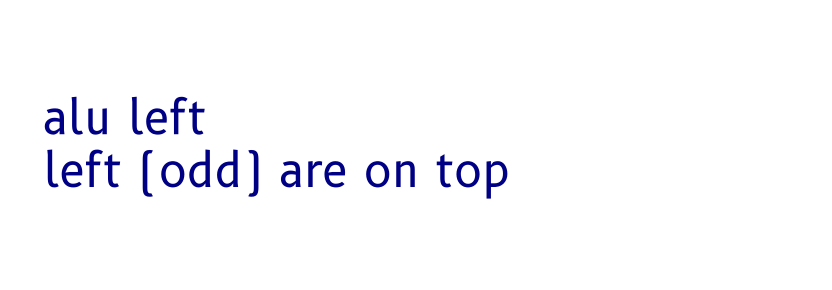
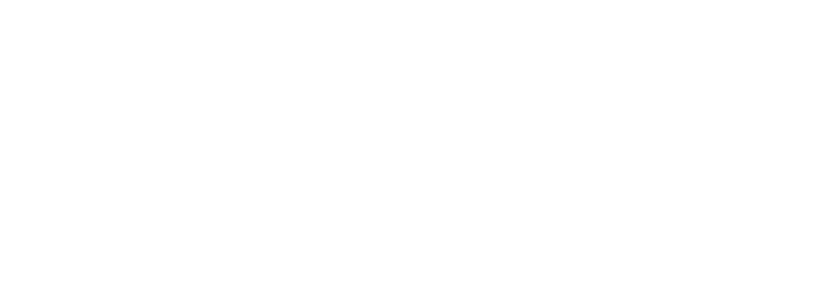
text: alu left (124, 115) -> none
text: left (odd) are on top (277, 174) -> none

